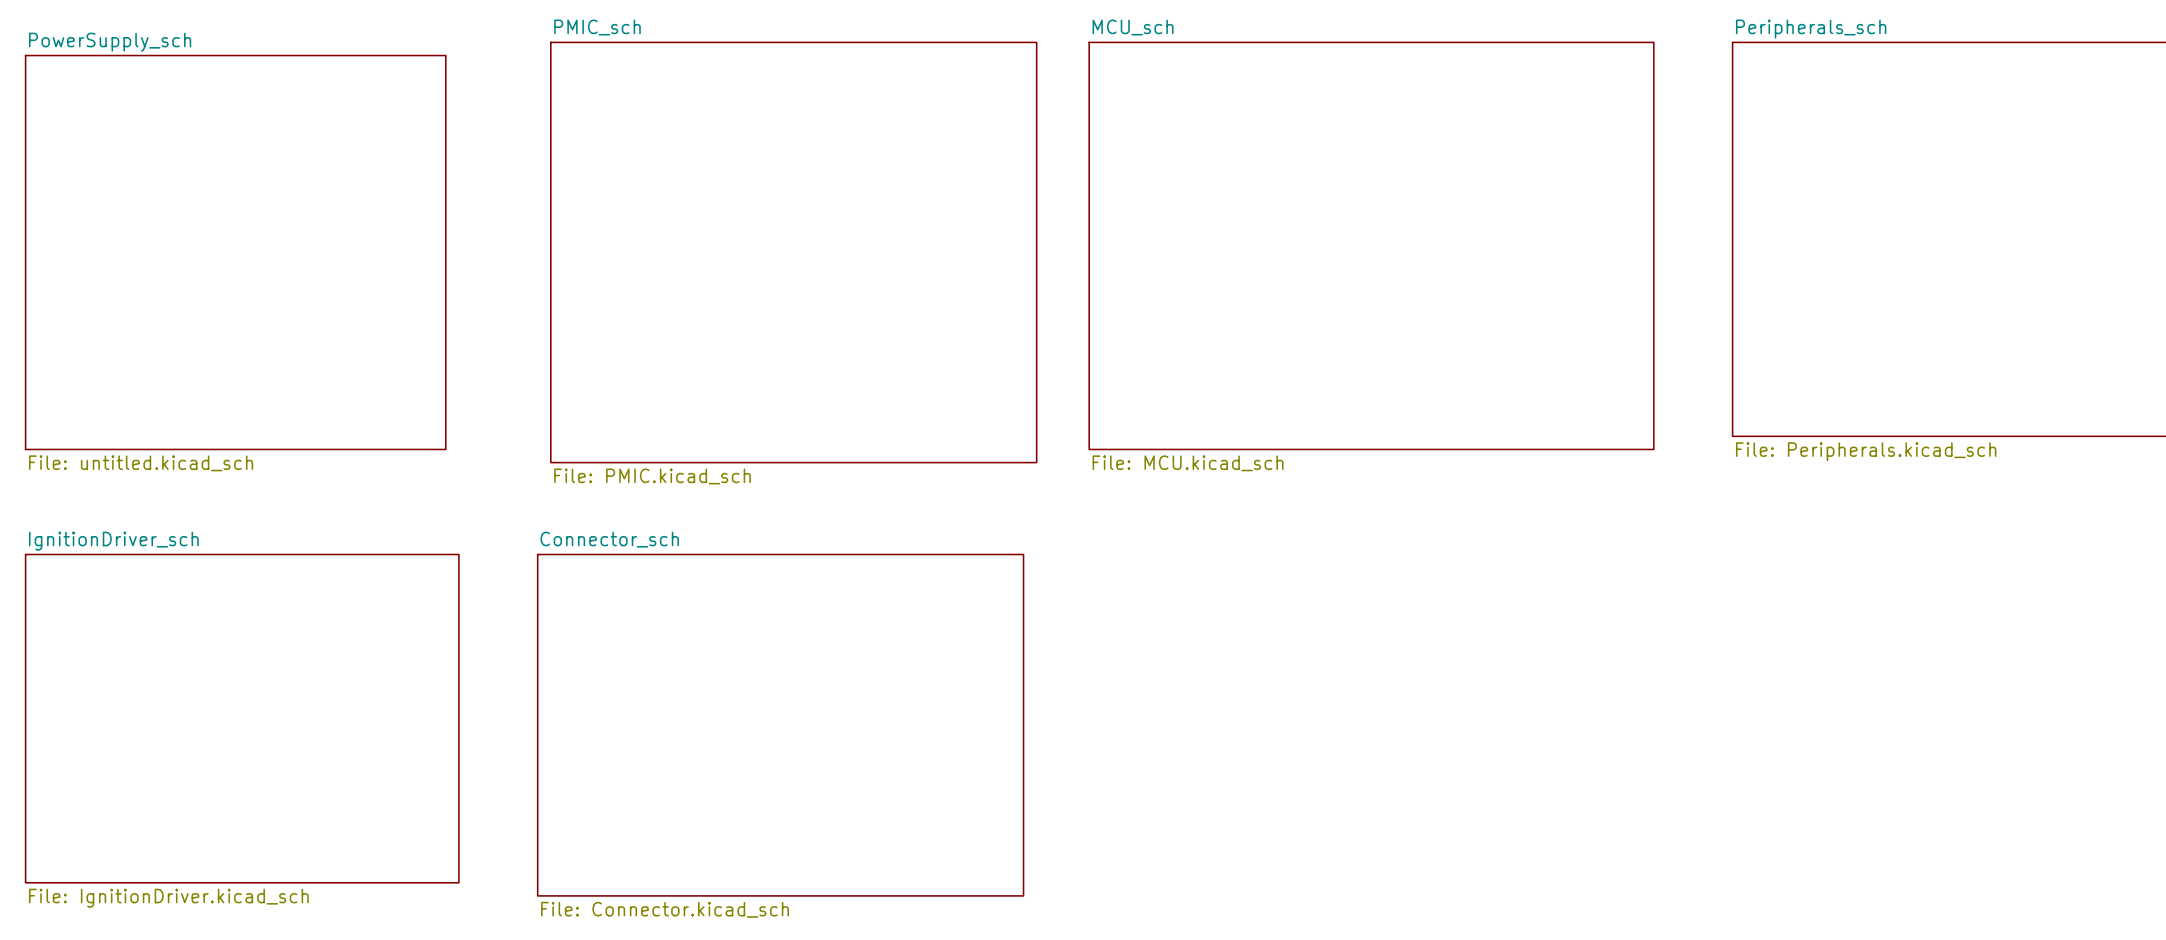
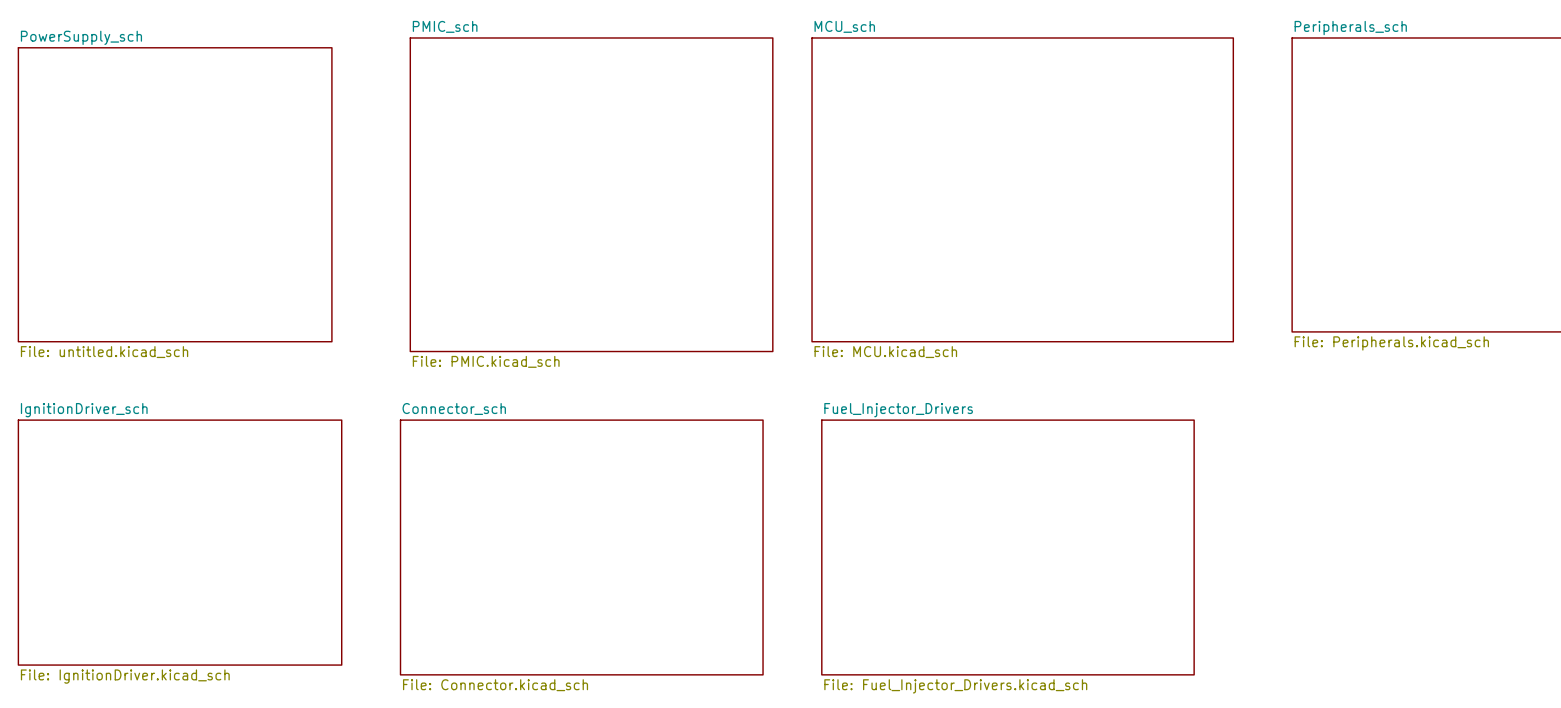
sheet Fuel_Injector_Drivers: none -> File: Fuel_Injector_Drivers.kicad_sch (1007, 547)

